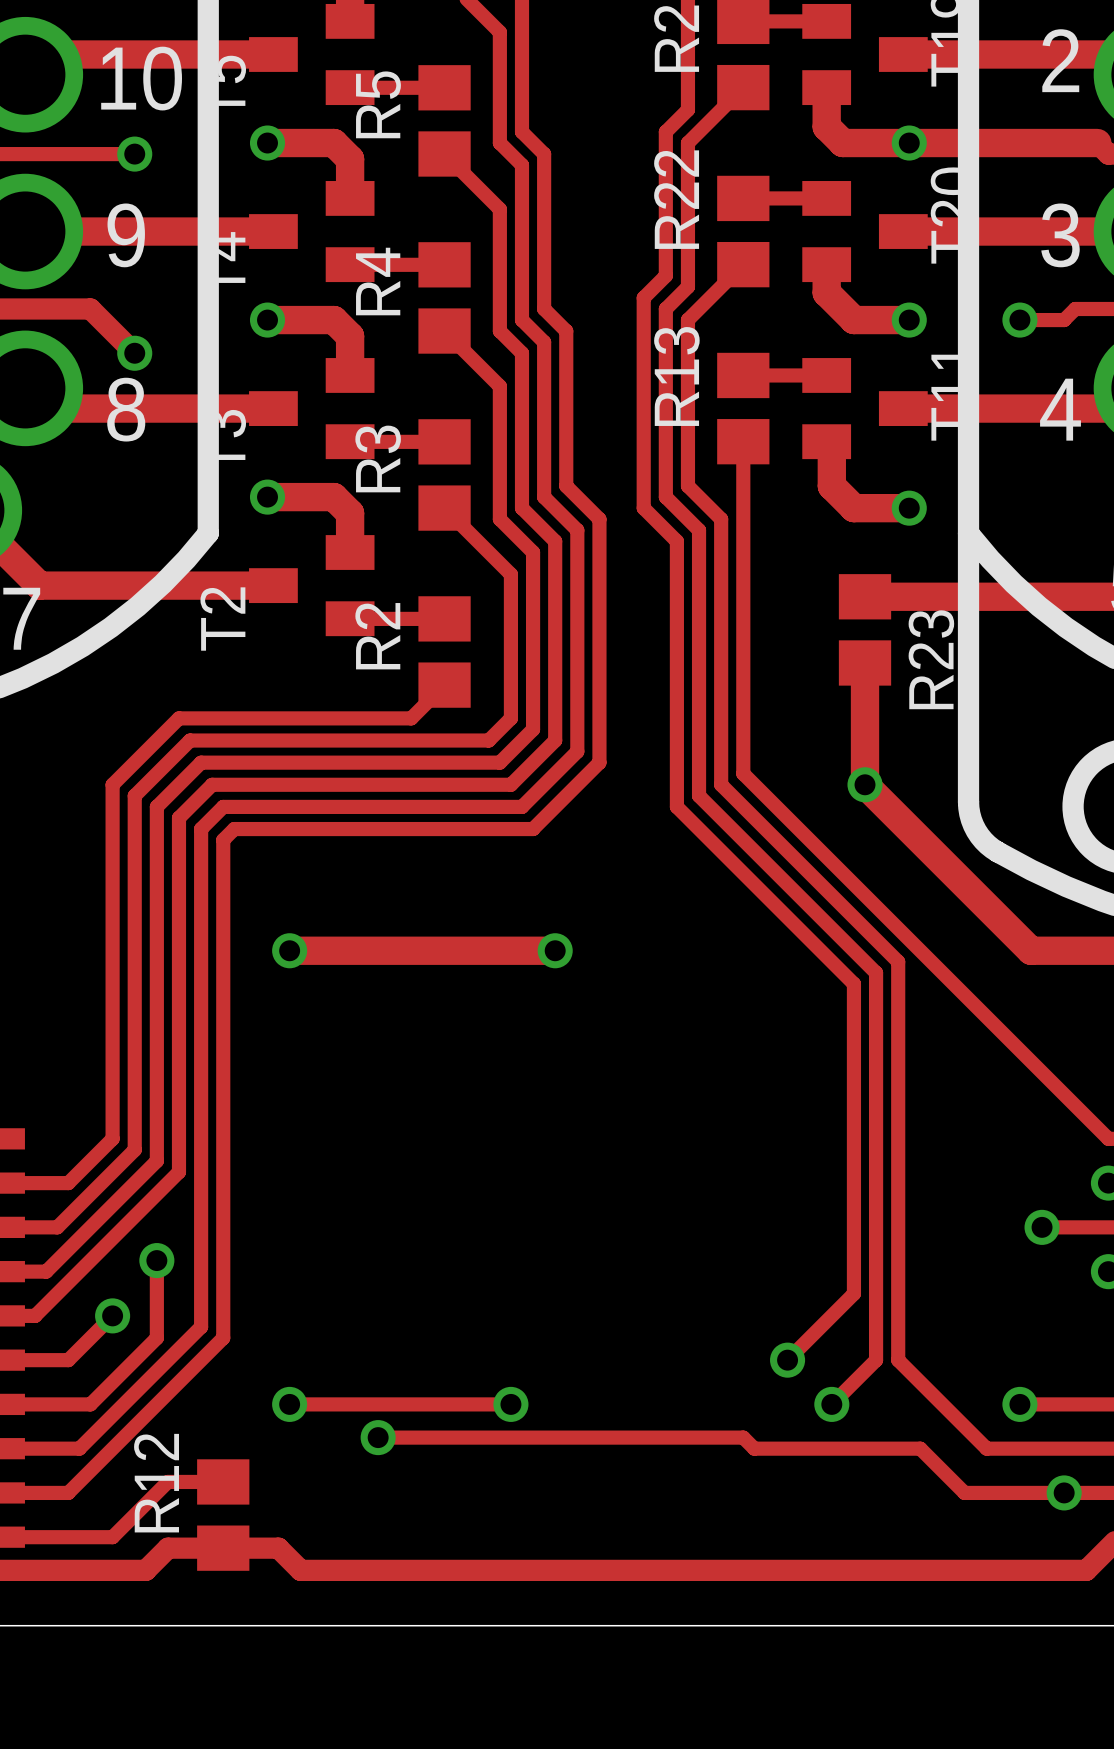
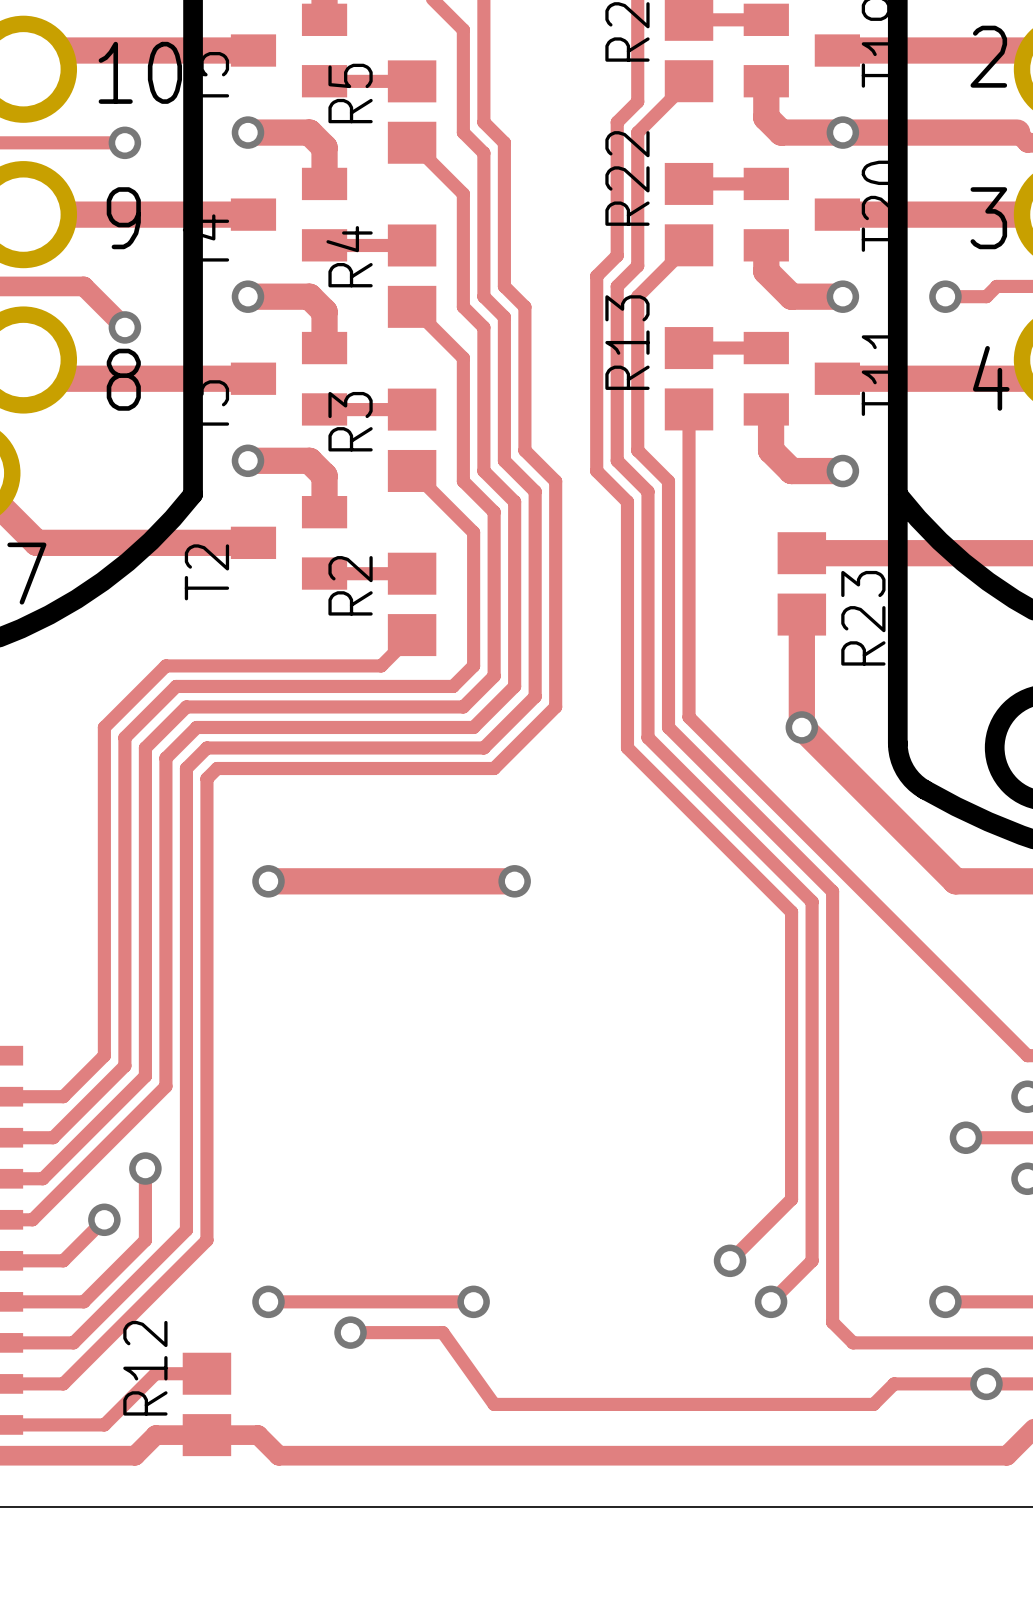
track: (898, 1360) (986, 1448) -> (832, 1260) (832, 1322) (853, 1342) (914, 1342)
track: (477, 1437) (743, 1437) (754, 1448) (920, 1448) (964, 1492) -> (442, 1332) (494, 1404) (873, 1404) (894, 1383)

